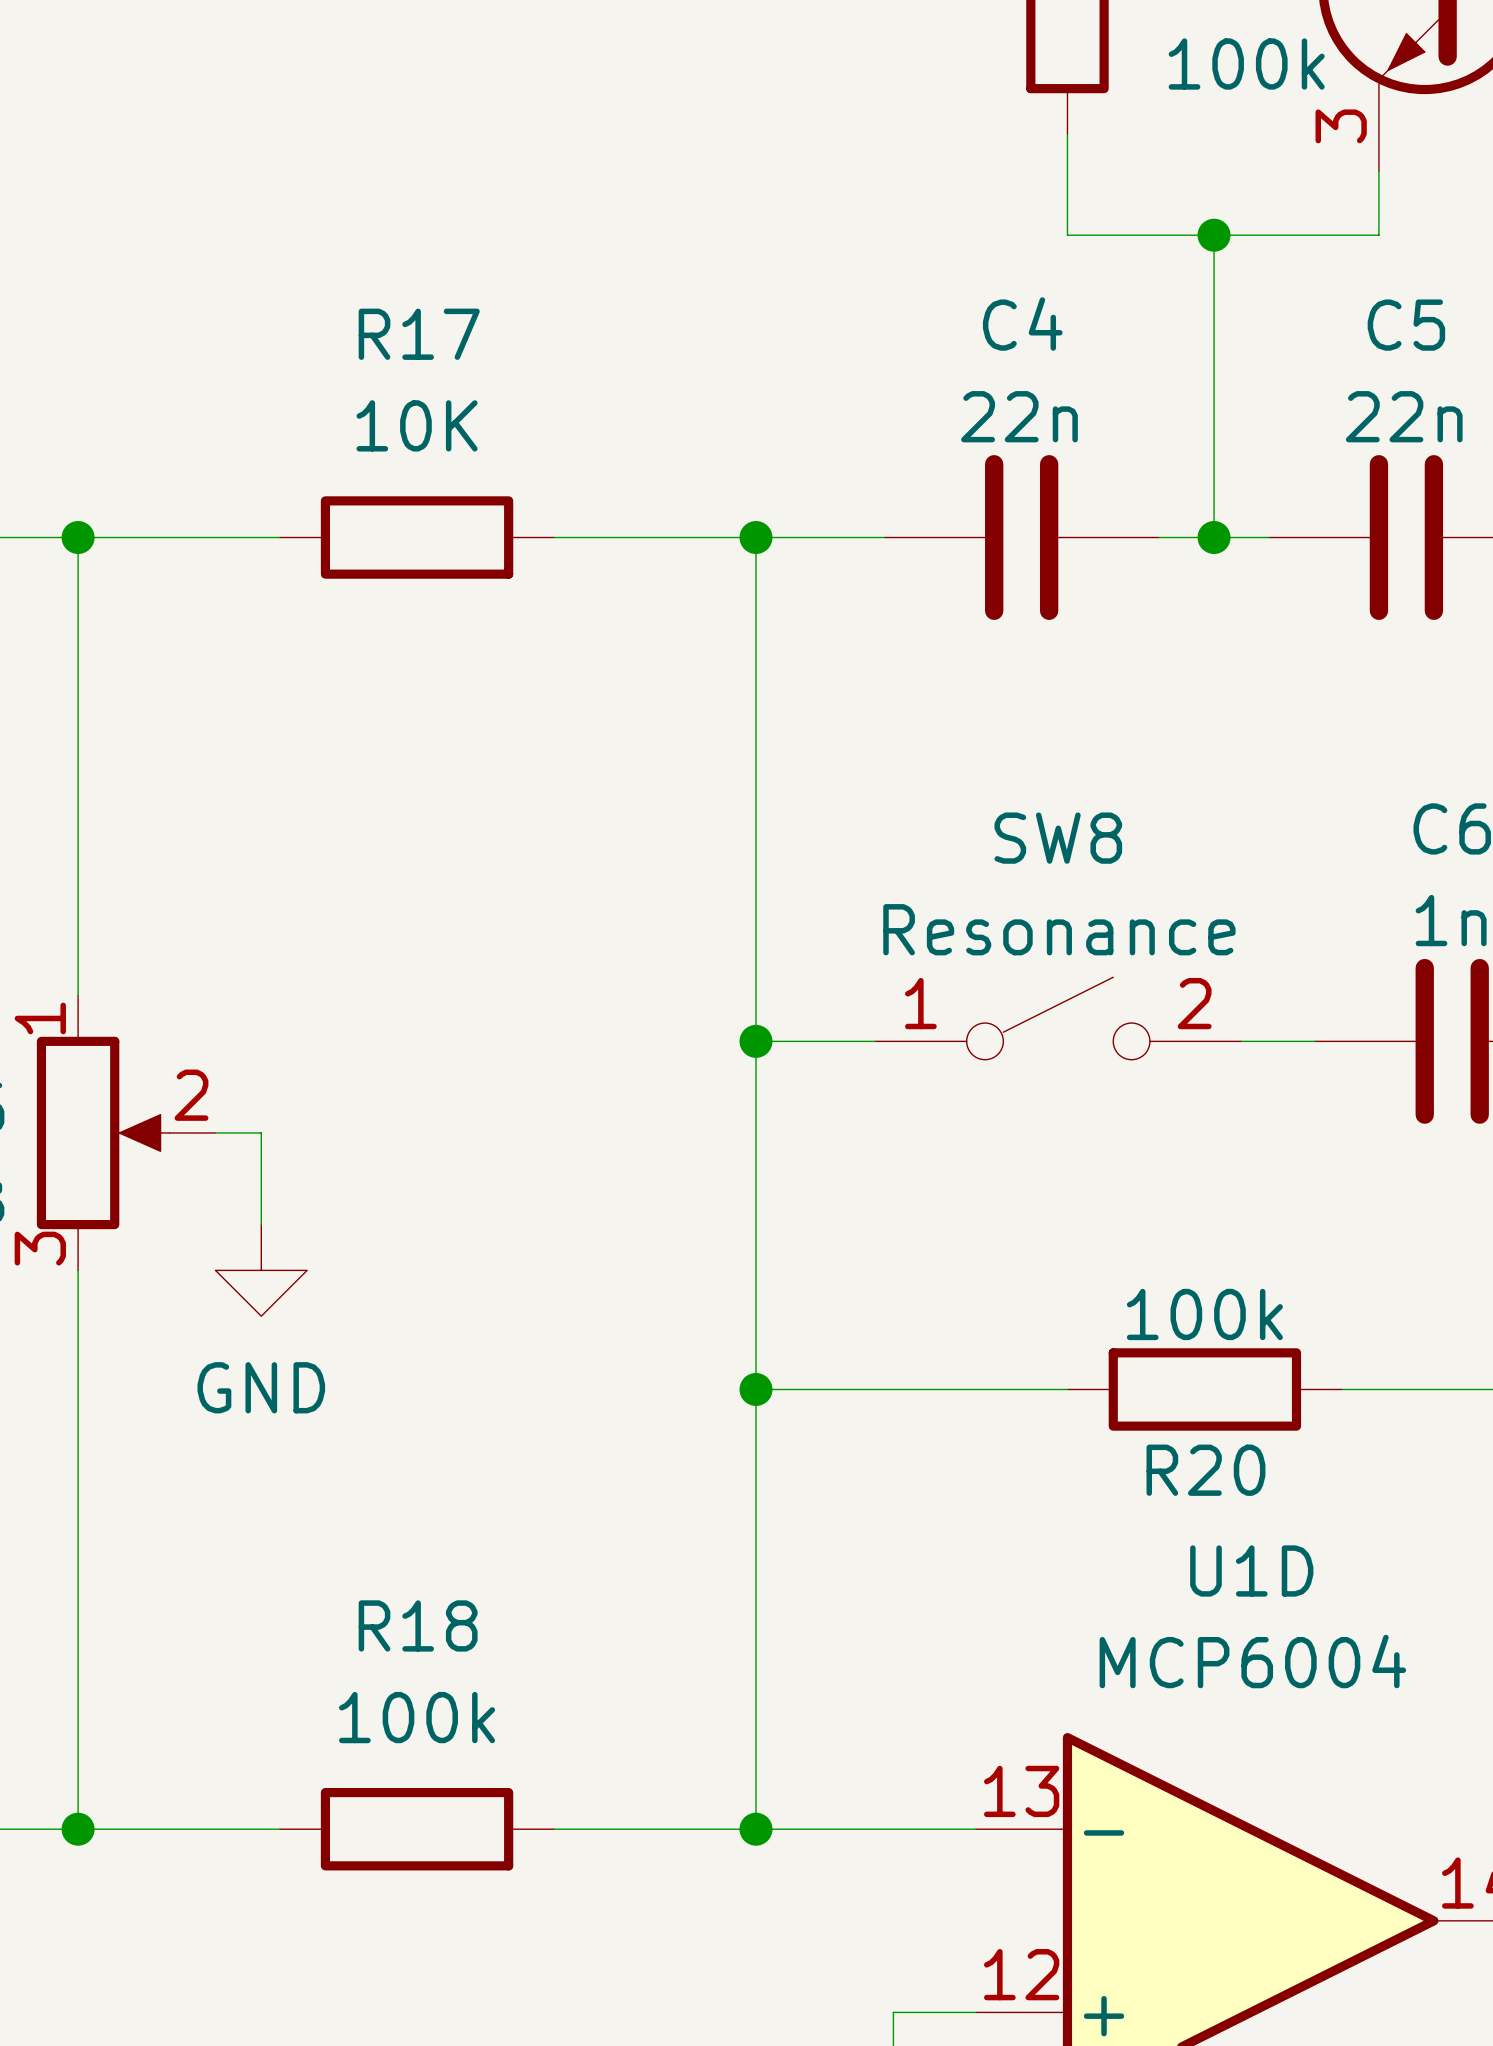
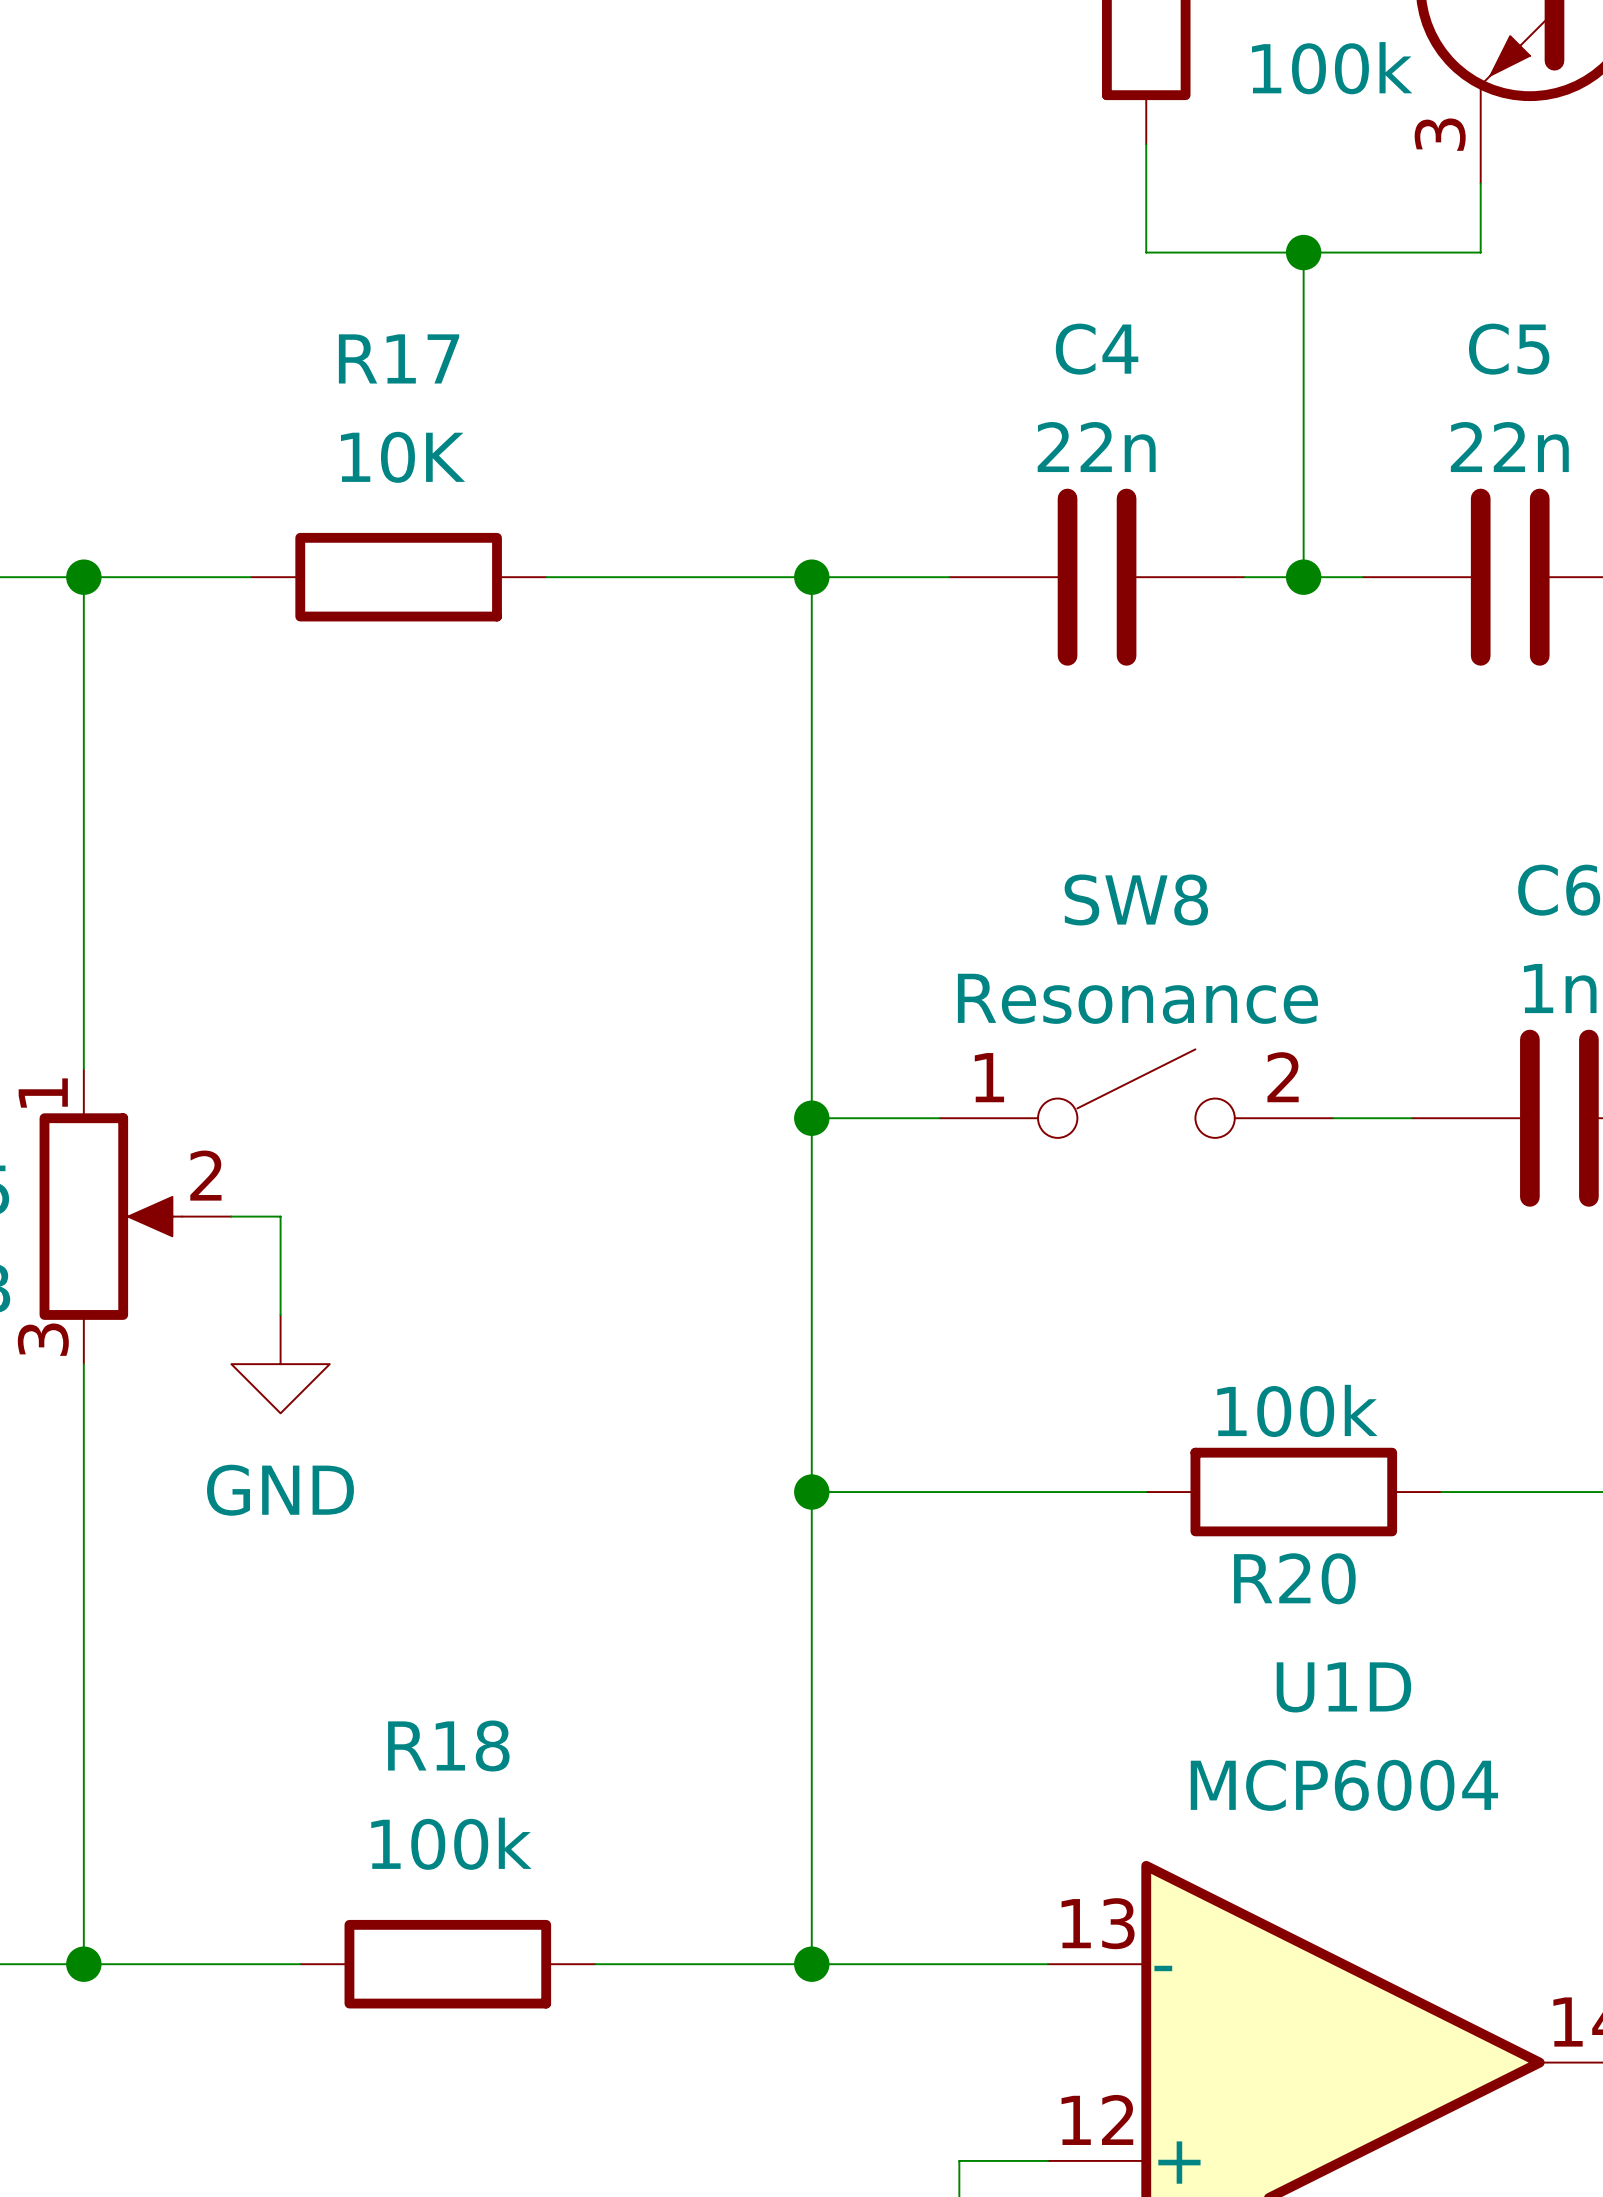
R17 position: (417, 537) -> (398, 577)

